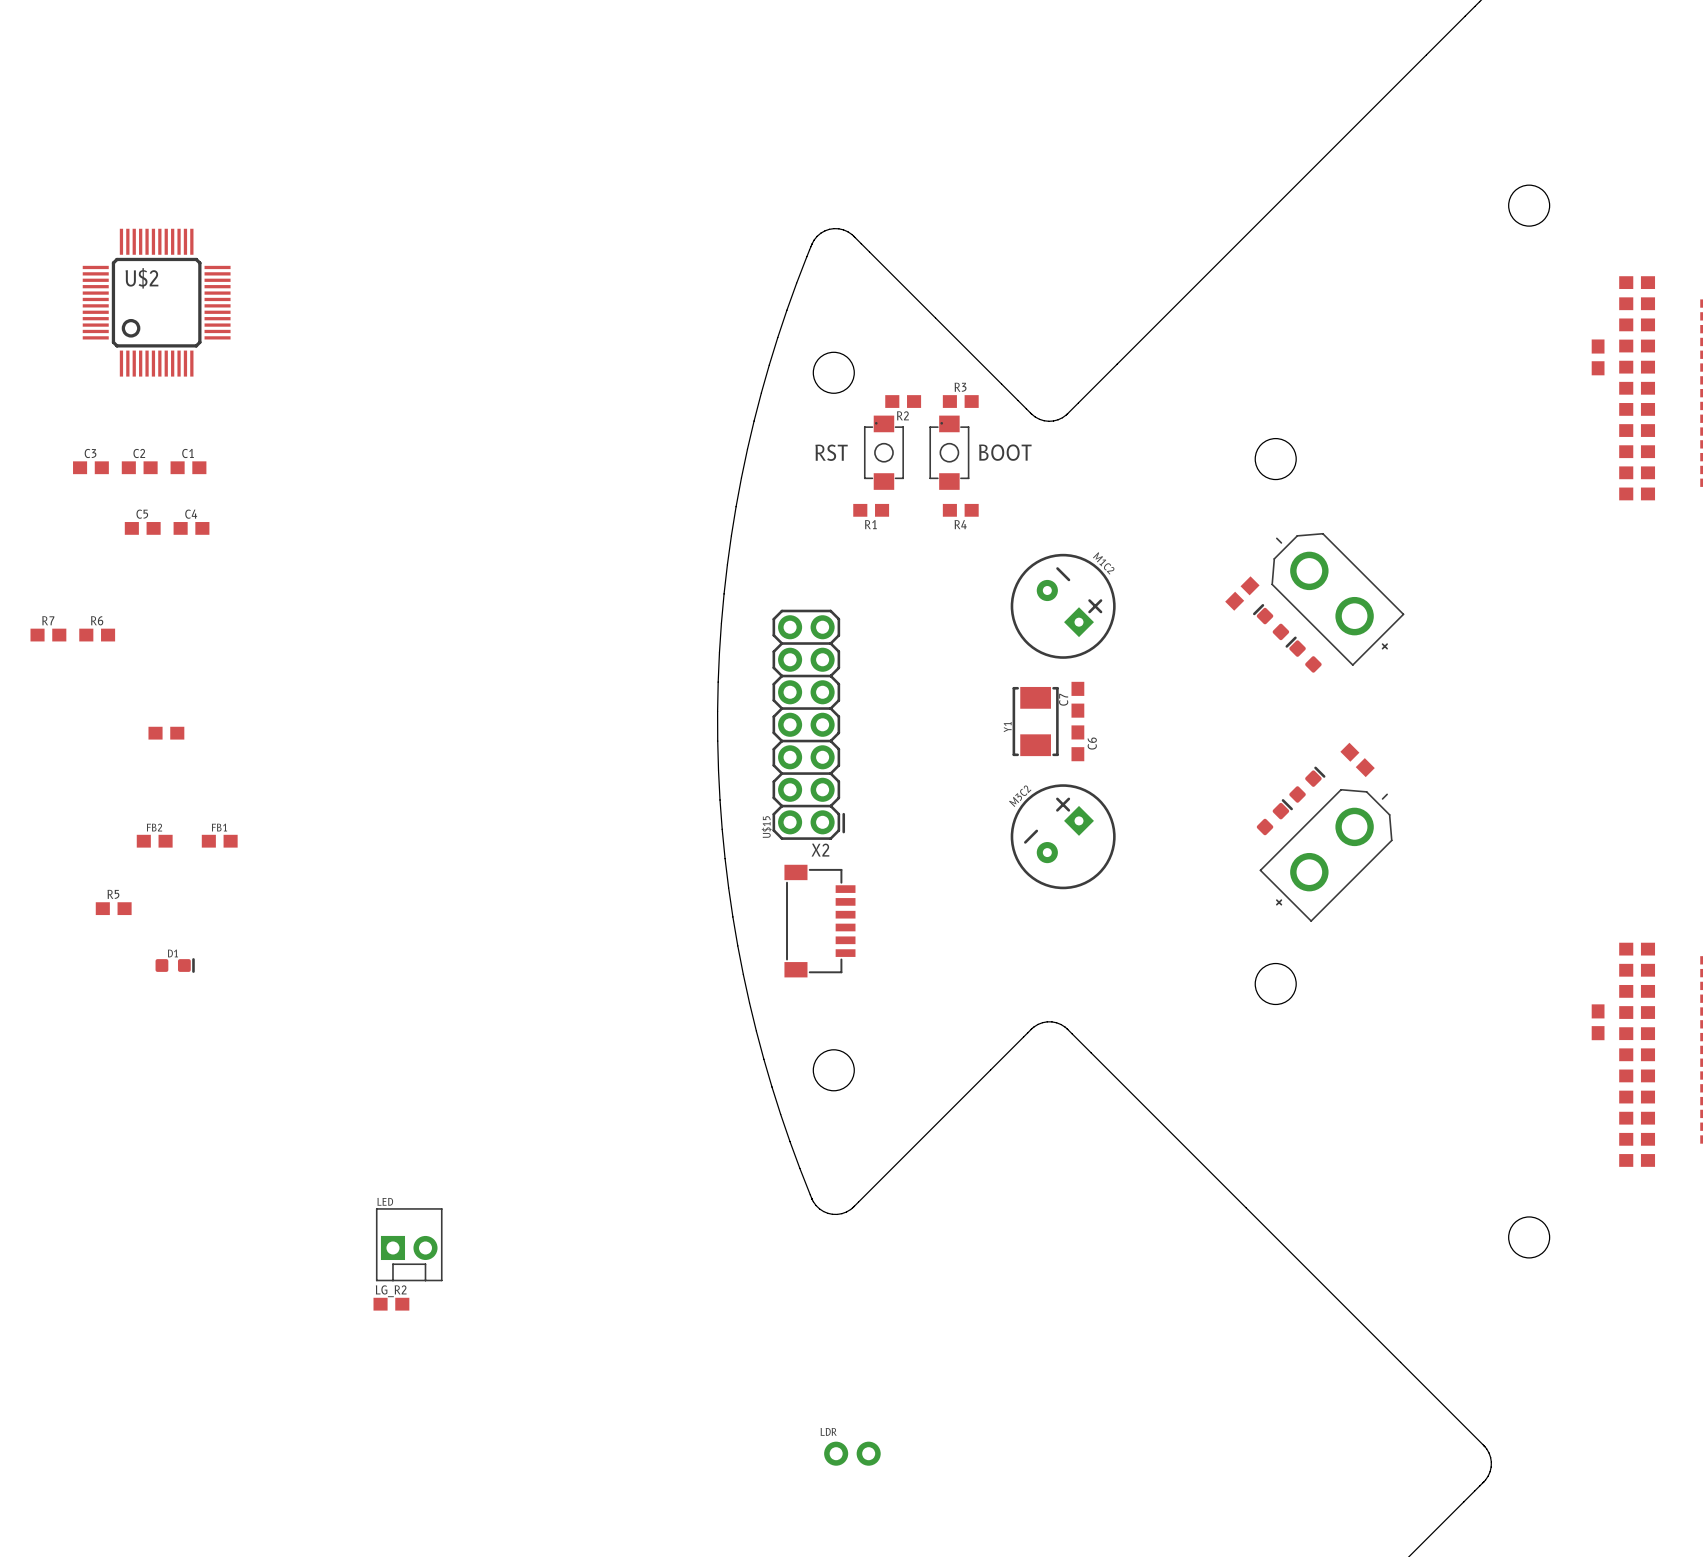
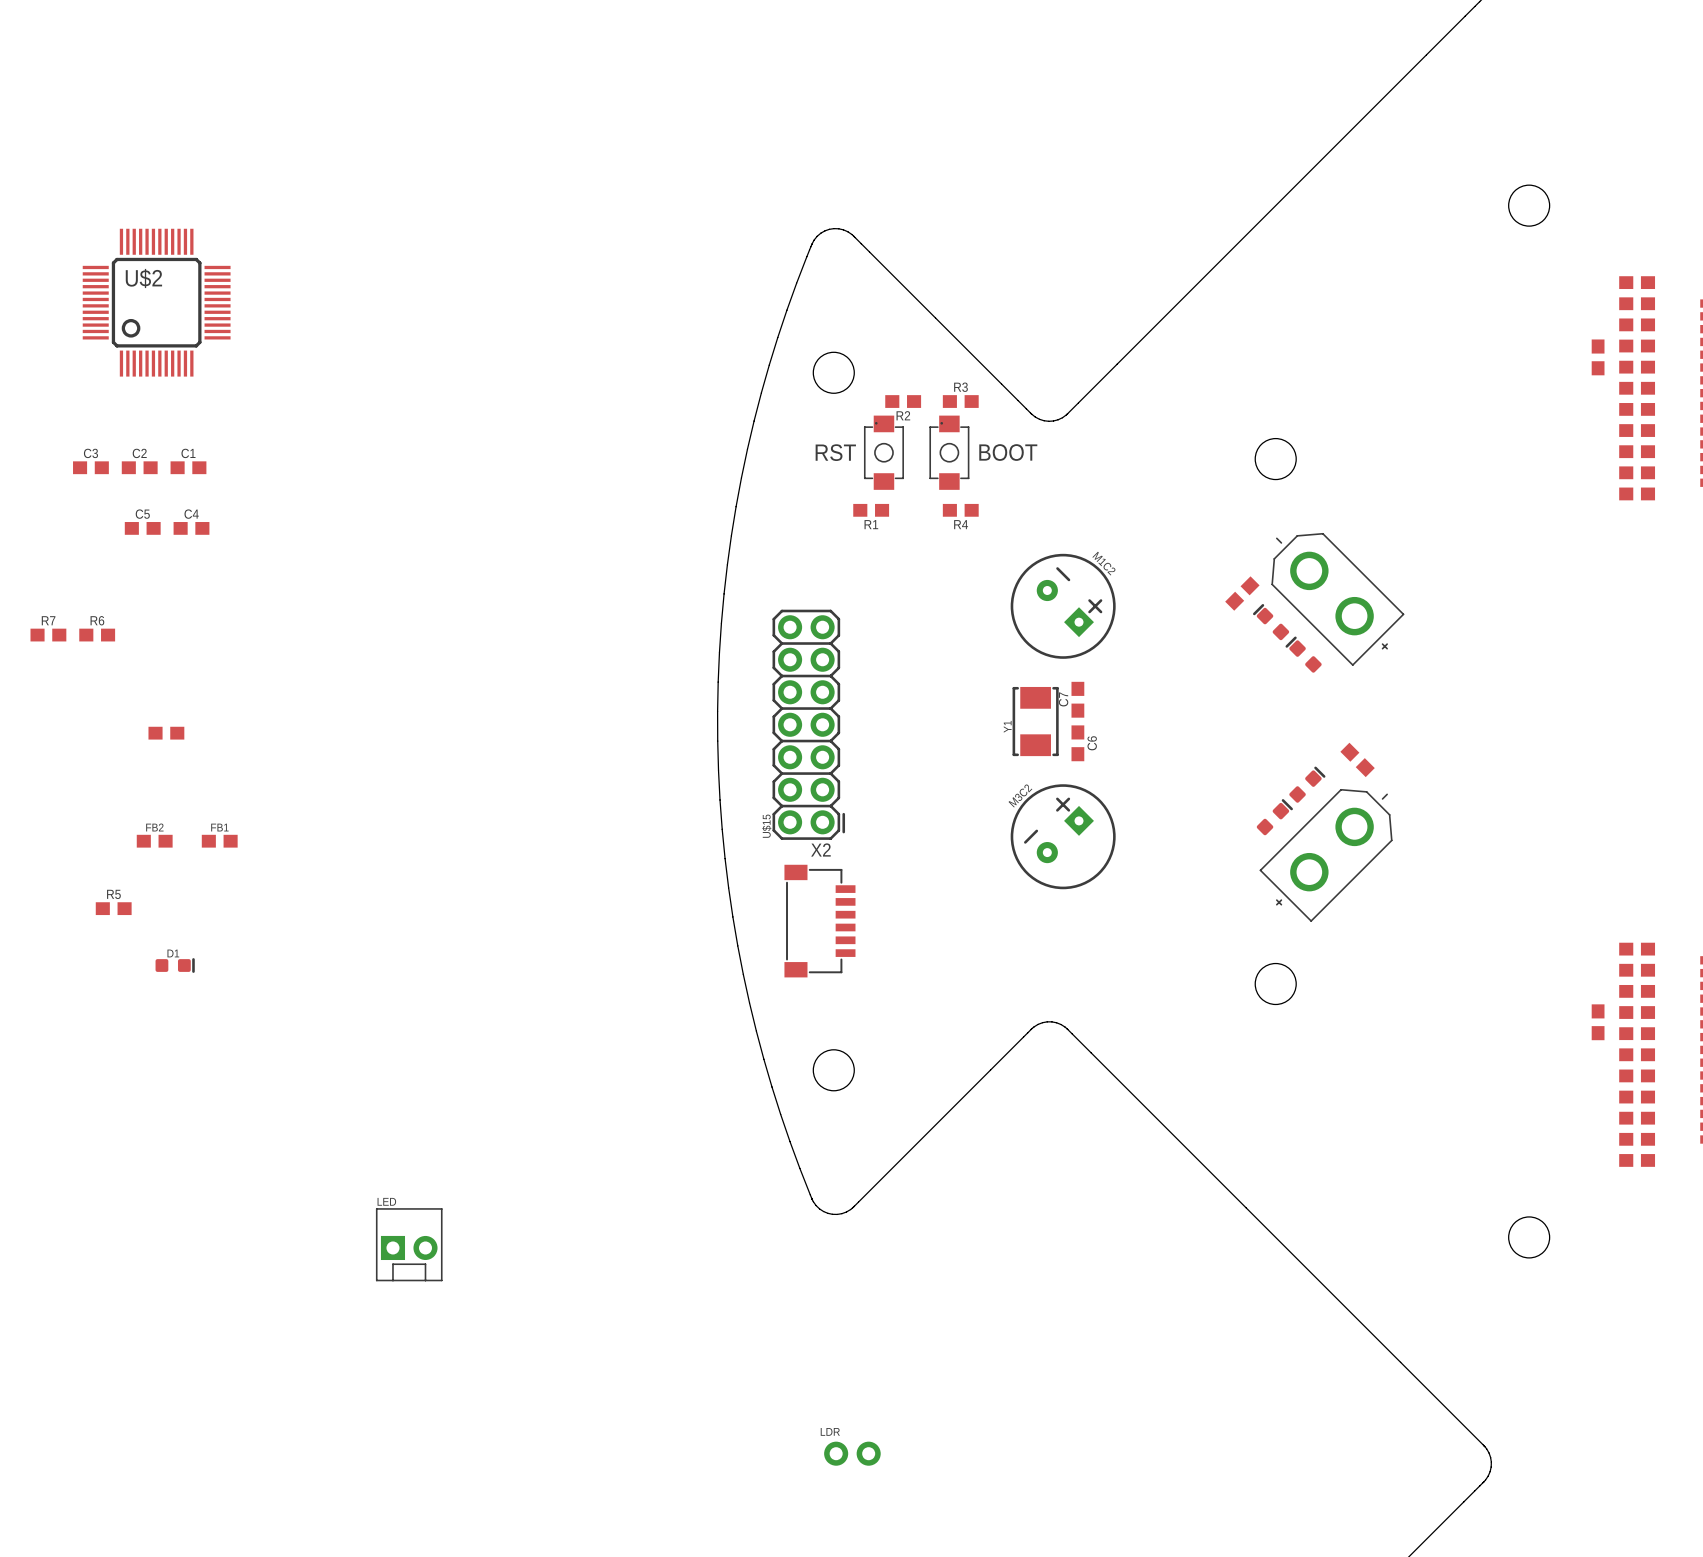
LG_R2: (391, 1304) -> none

